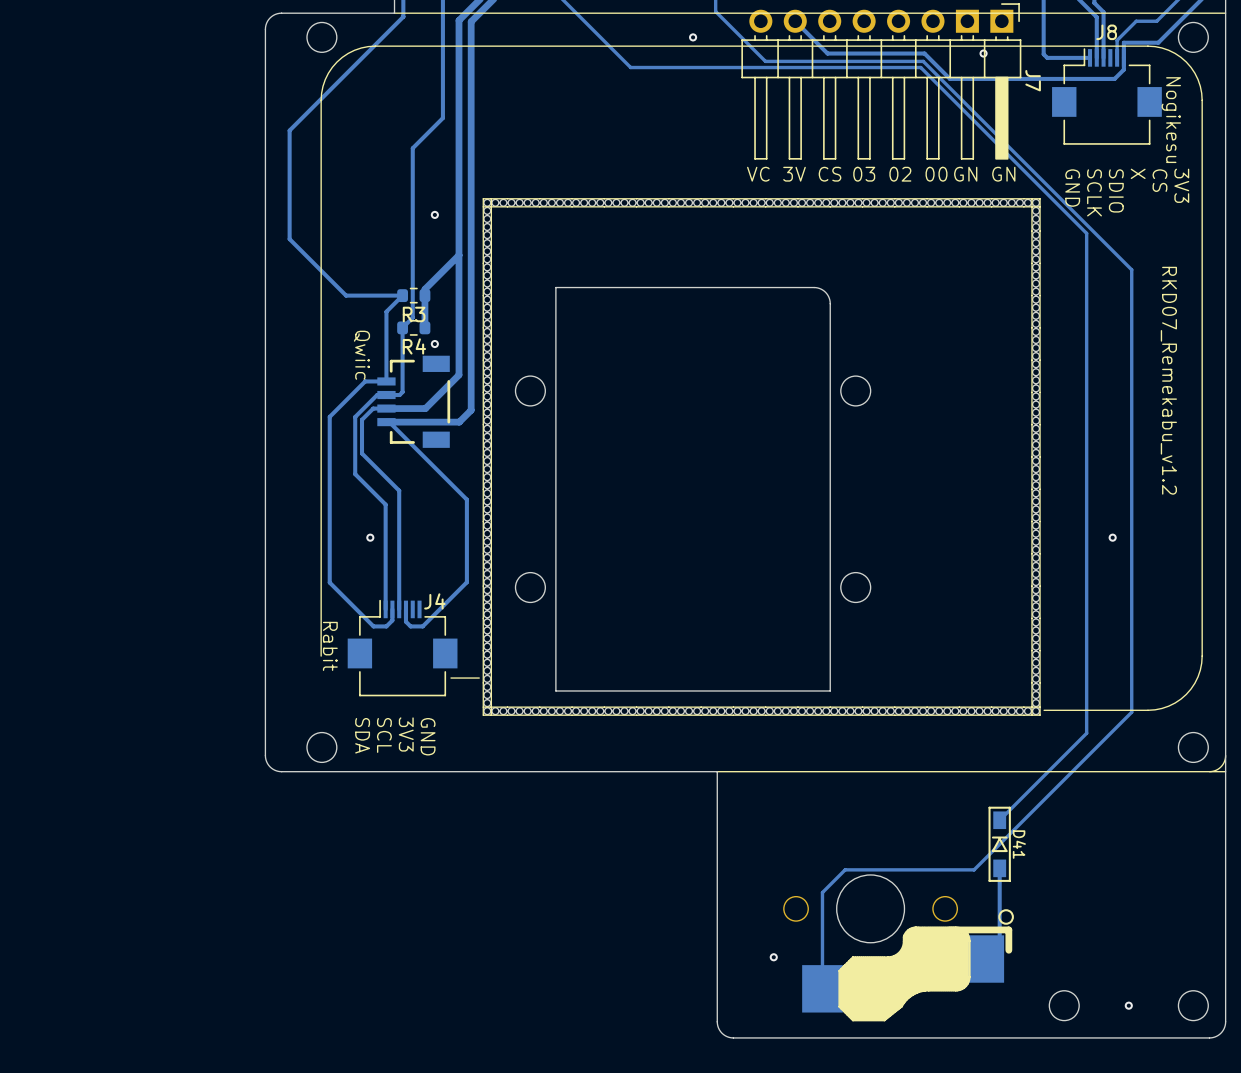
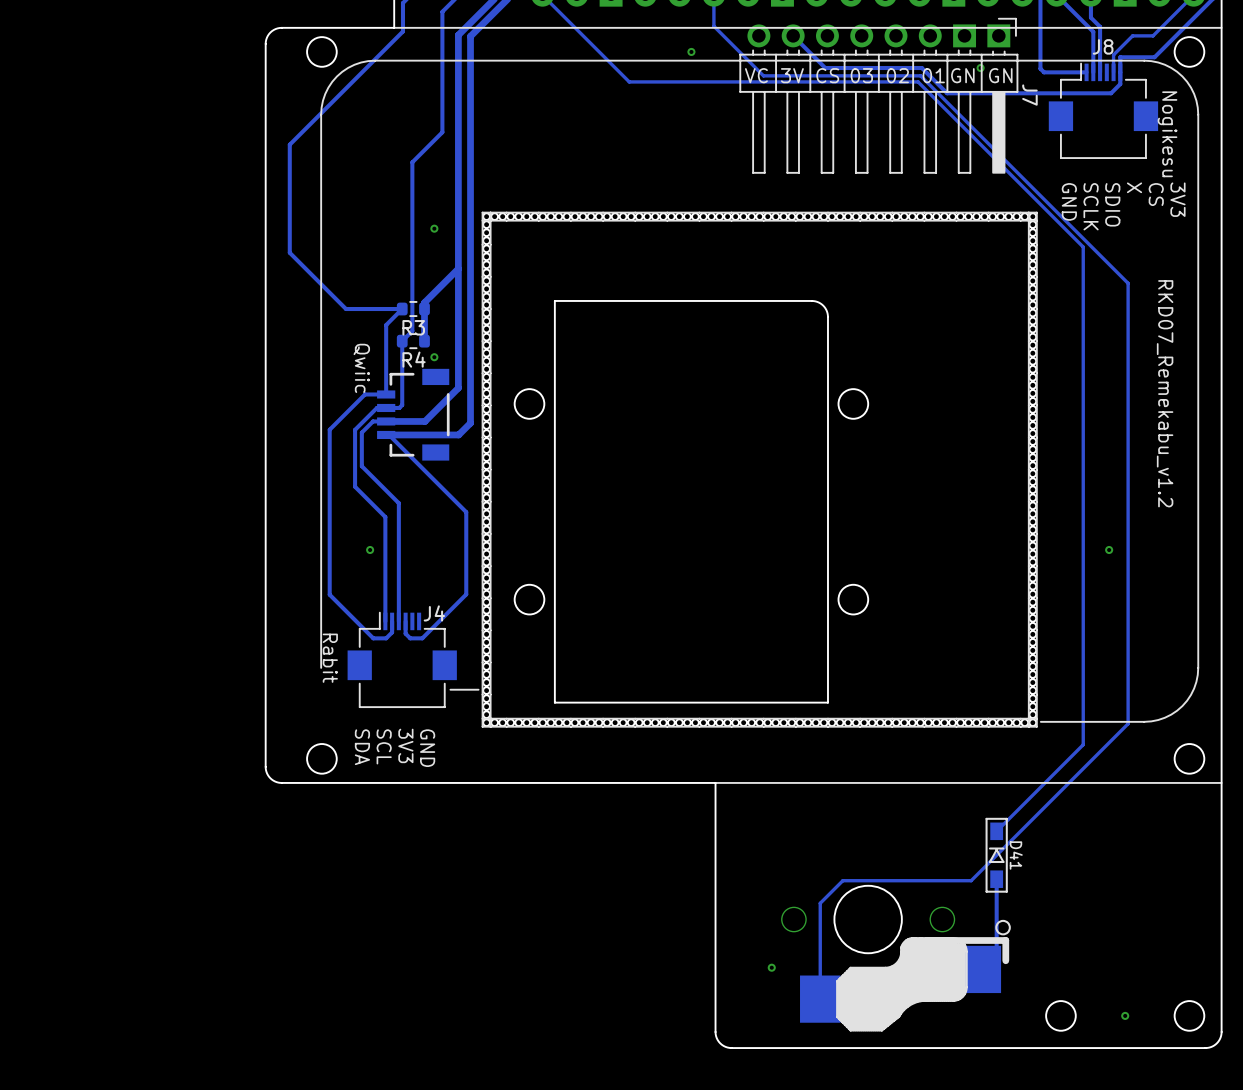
text: none -> 03 02 01 (897, 75)
text position: VC 3V CS (794, 174) -> VC 3V CS (792, 75)
text: 03 02 00 (900, 174) -> none
text position: GN GN (984, 174) -> GN GN (981, 75)
line: (1225, 755) (1220, 766) (1209, 771) -> none

